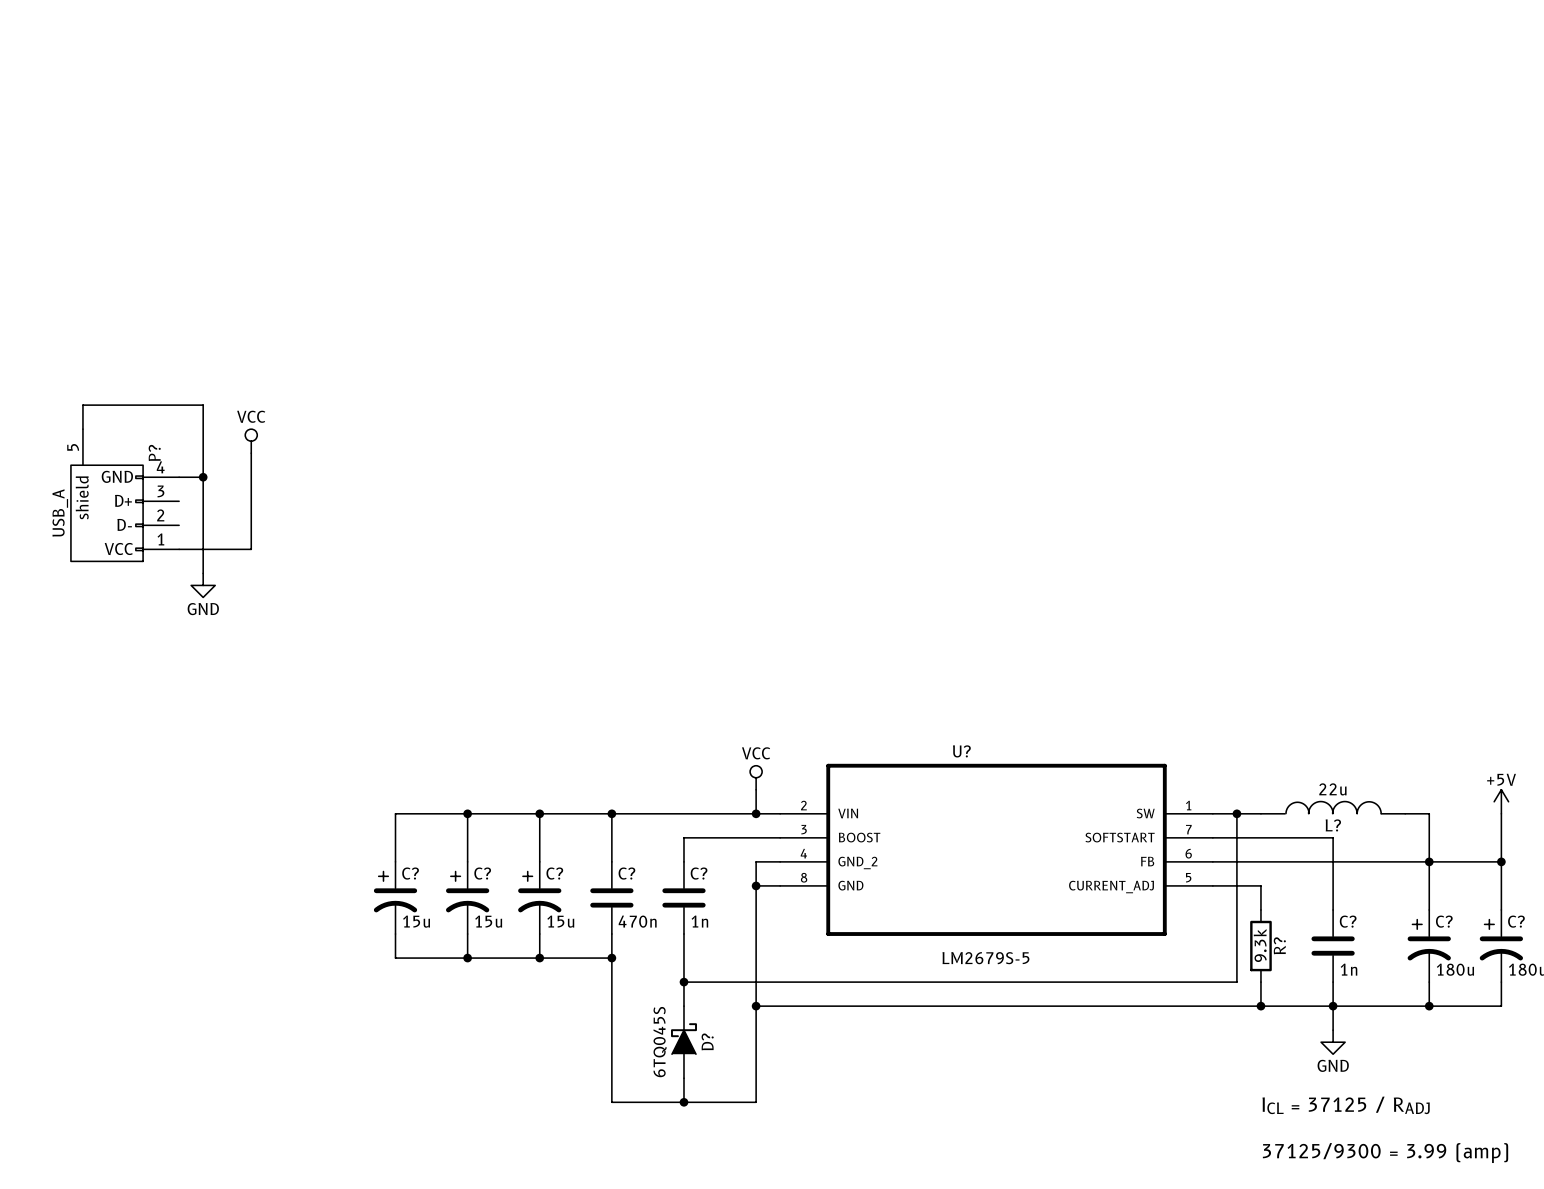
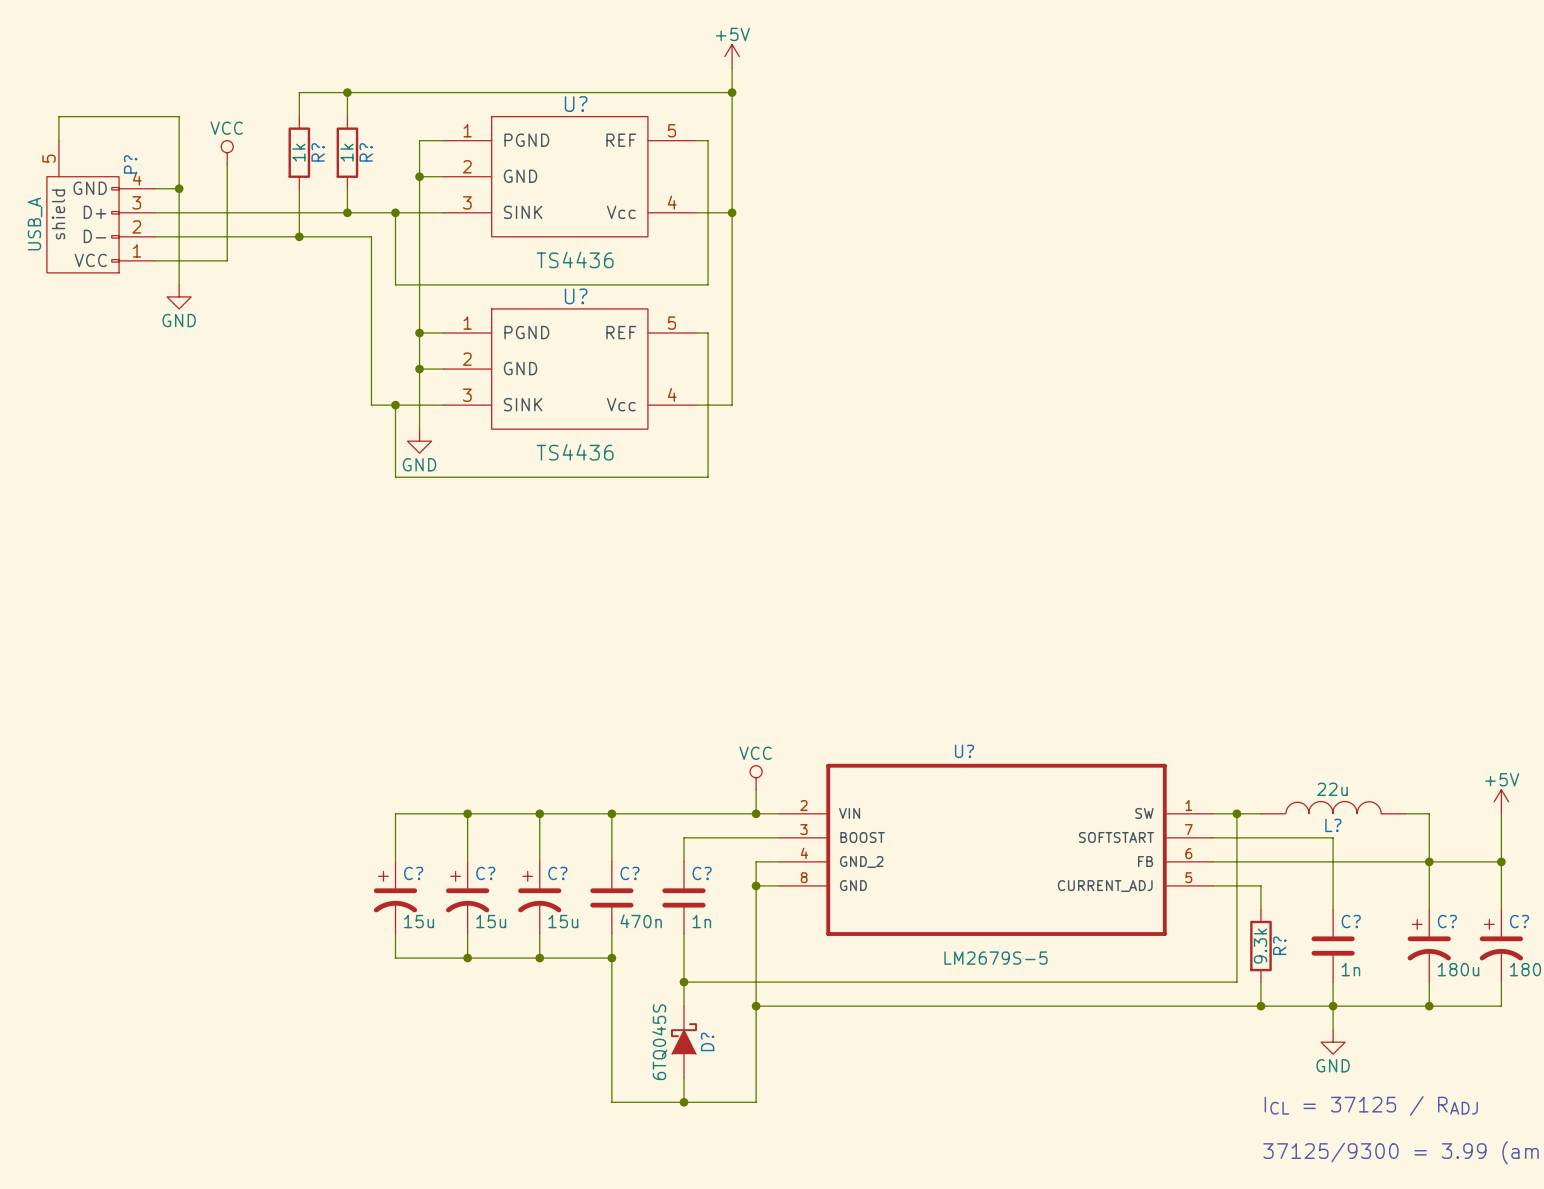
power symbol: none -> +5V (732, 56)
wire: none -> (732, 68) (732, 405) (696, 405)
wire: none -> (347, 92) (347, 116)
junction: none -> (347, 92)
wire: none -> (732, 92) (299, 92) (299, 116)
junction: none -> (732, 92)
wire: none -> (58, 140) (58, 116) (179, 116) (179, 284)
wire: none -> (443, 140) (419, 140) (419, 429)
wire: none -> (696, 140) (708, 140) (708, 284) (395, 284) (395, 212)
power symbol: none -> VCC (227, 152)
R?: none -> 1k (299, 152)
R?: none -> 1k (347, 152)
wire: none -> (227, 164) (227, 260) (155, 260)
wire: none -> (419, 176) (443, 176)
junction: none -> (419, 176)
U?: none -> TS4436 (569, 176)
wire: none -> (155, 188) (179, 188)
junction: none -> (179, 188)
wire: none -> (299, 188) (299, 236)
wire: none -> (347, 188) (347, 212)
P?: none -> USB_A (101, 206)
wire: none -> (155, 212) (443, 212)
junction: none -> (347, 212)
junction: none -> (395, 212)
wire: none -> (696, 212) (732, 212)
junction: none -> (732, 212)
wire: none -> (155, 236) (371, 236) (371, 405) (443, 405)
junction: none -> (299, 236)
power symbol: none -> GND (179, 296)
wire: none -> (419, 332) (443, 332)
junction: none -> (419, 332)
wire: none -> (696, 332) (708, 332) (708, 477) (395, 477) (395, 405)
wire: none -> (419, 369) (443, 369)
junction: none -> (419, 369)
U?: none -> TS4436 (569, 369)
junction: none -> (395, 405)
wire: (82, 429) (82, 405) (203, 405) (203, 573) -> none
power symbol: VCC (251, 441) -> none
power symbol: none -> GND (419, 441)
wire: (251, 453) (251, 549) (179, 549) -> none
wire: (179, 477) (203, 477) -> none
junction: (203, 477) -> none
P?: USB_A (125, 495) -> none
power symbol: GND (203, 585) -> none

